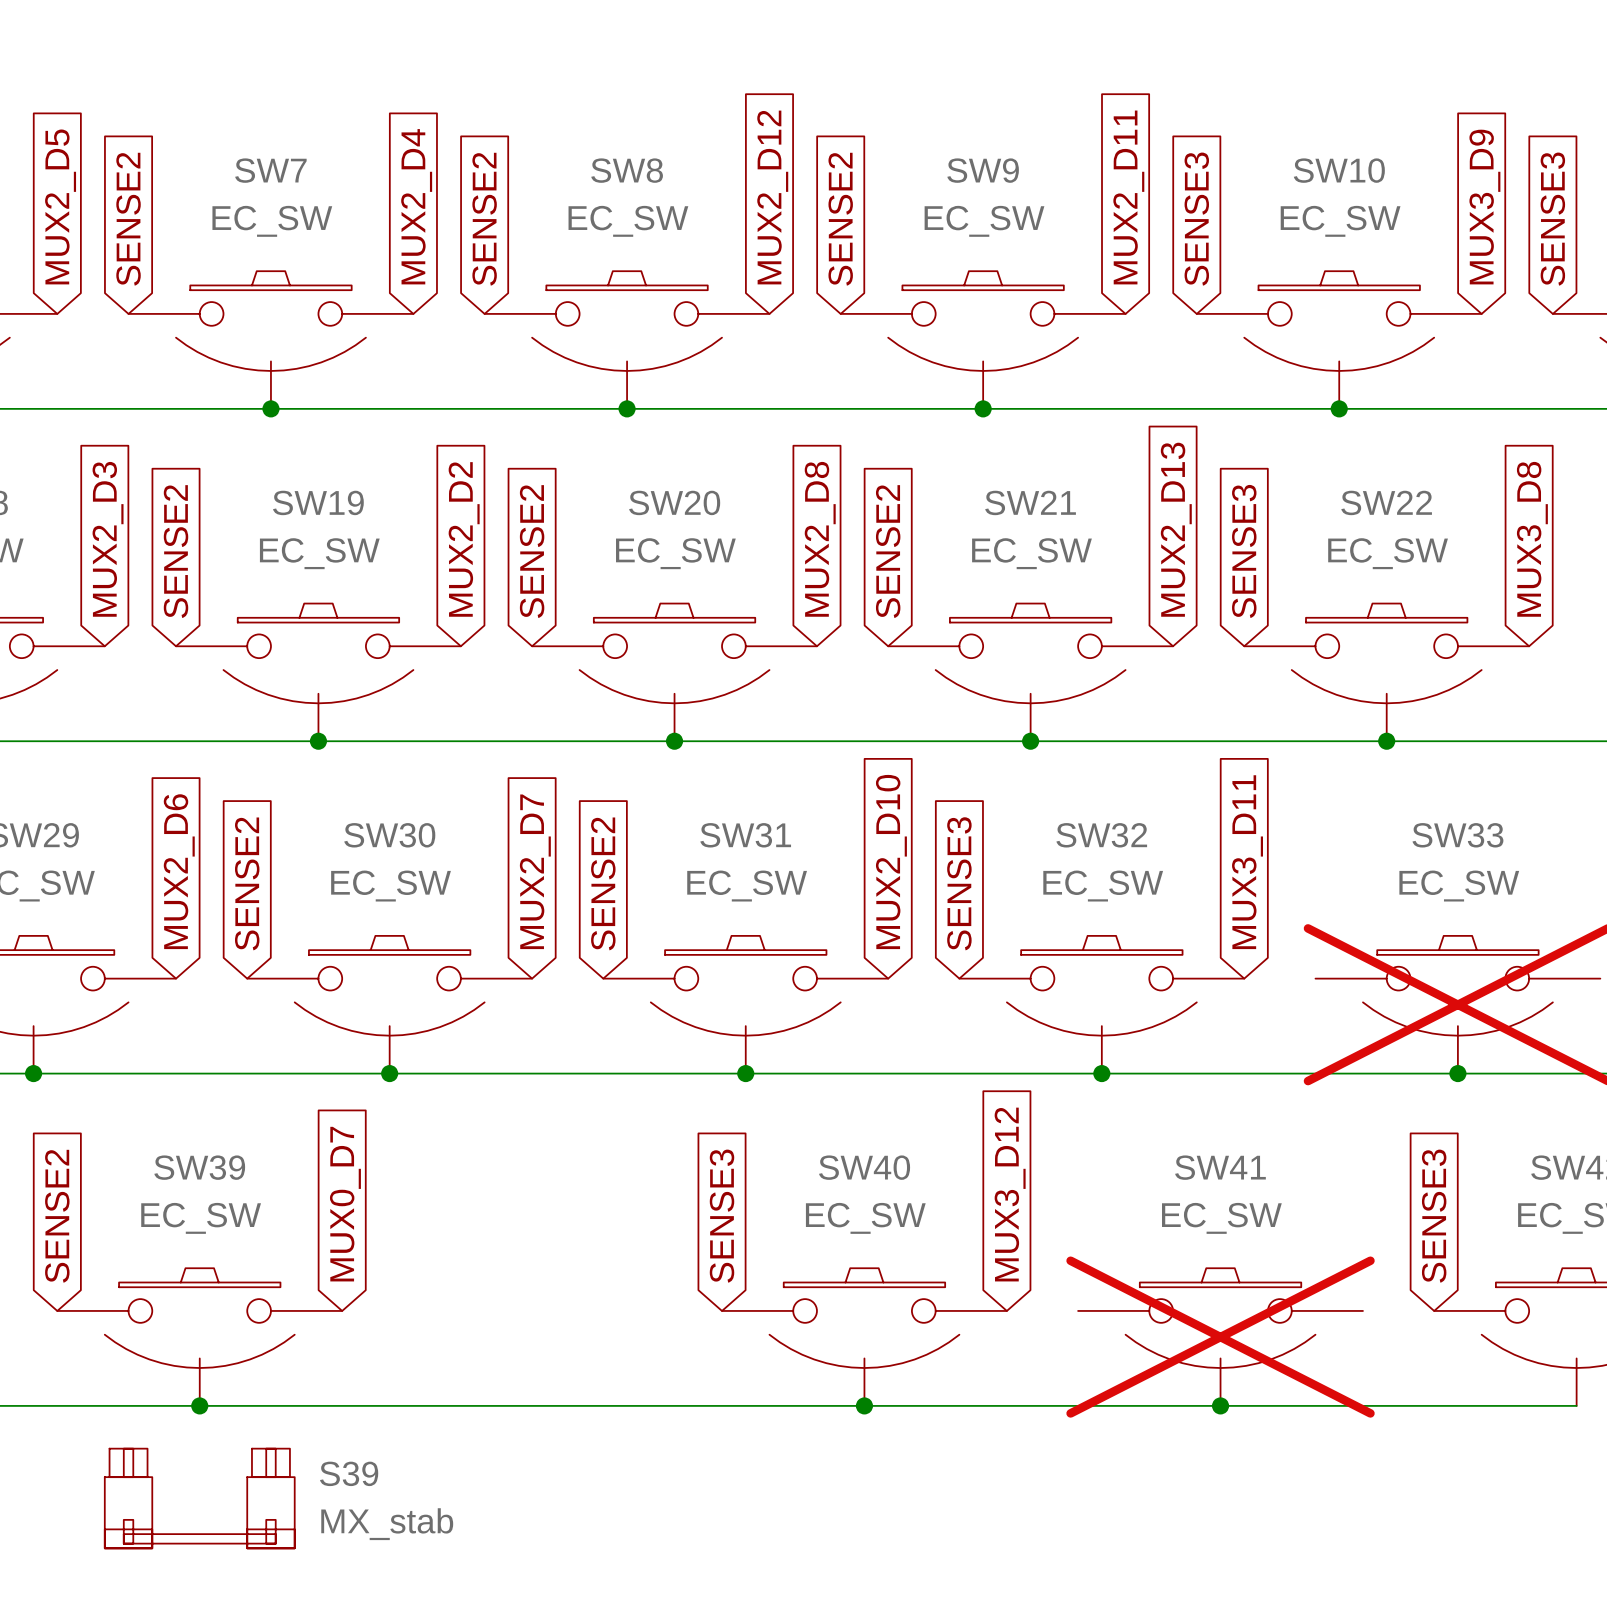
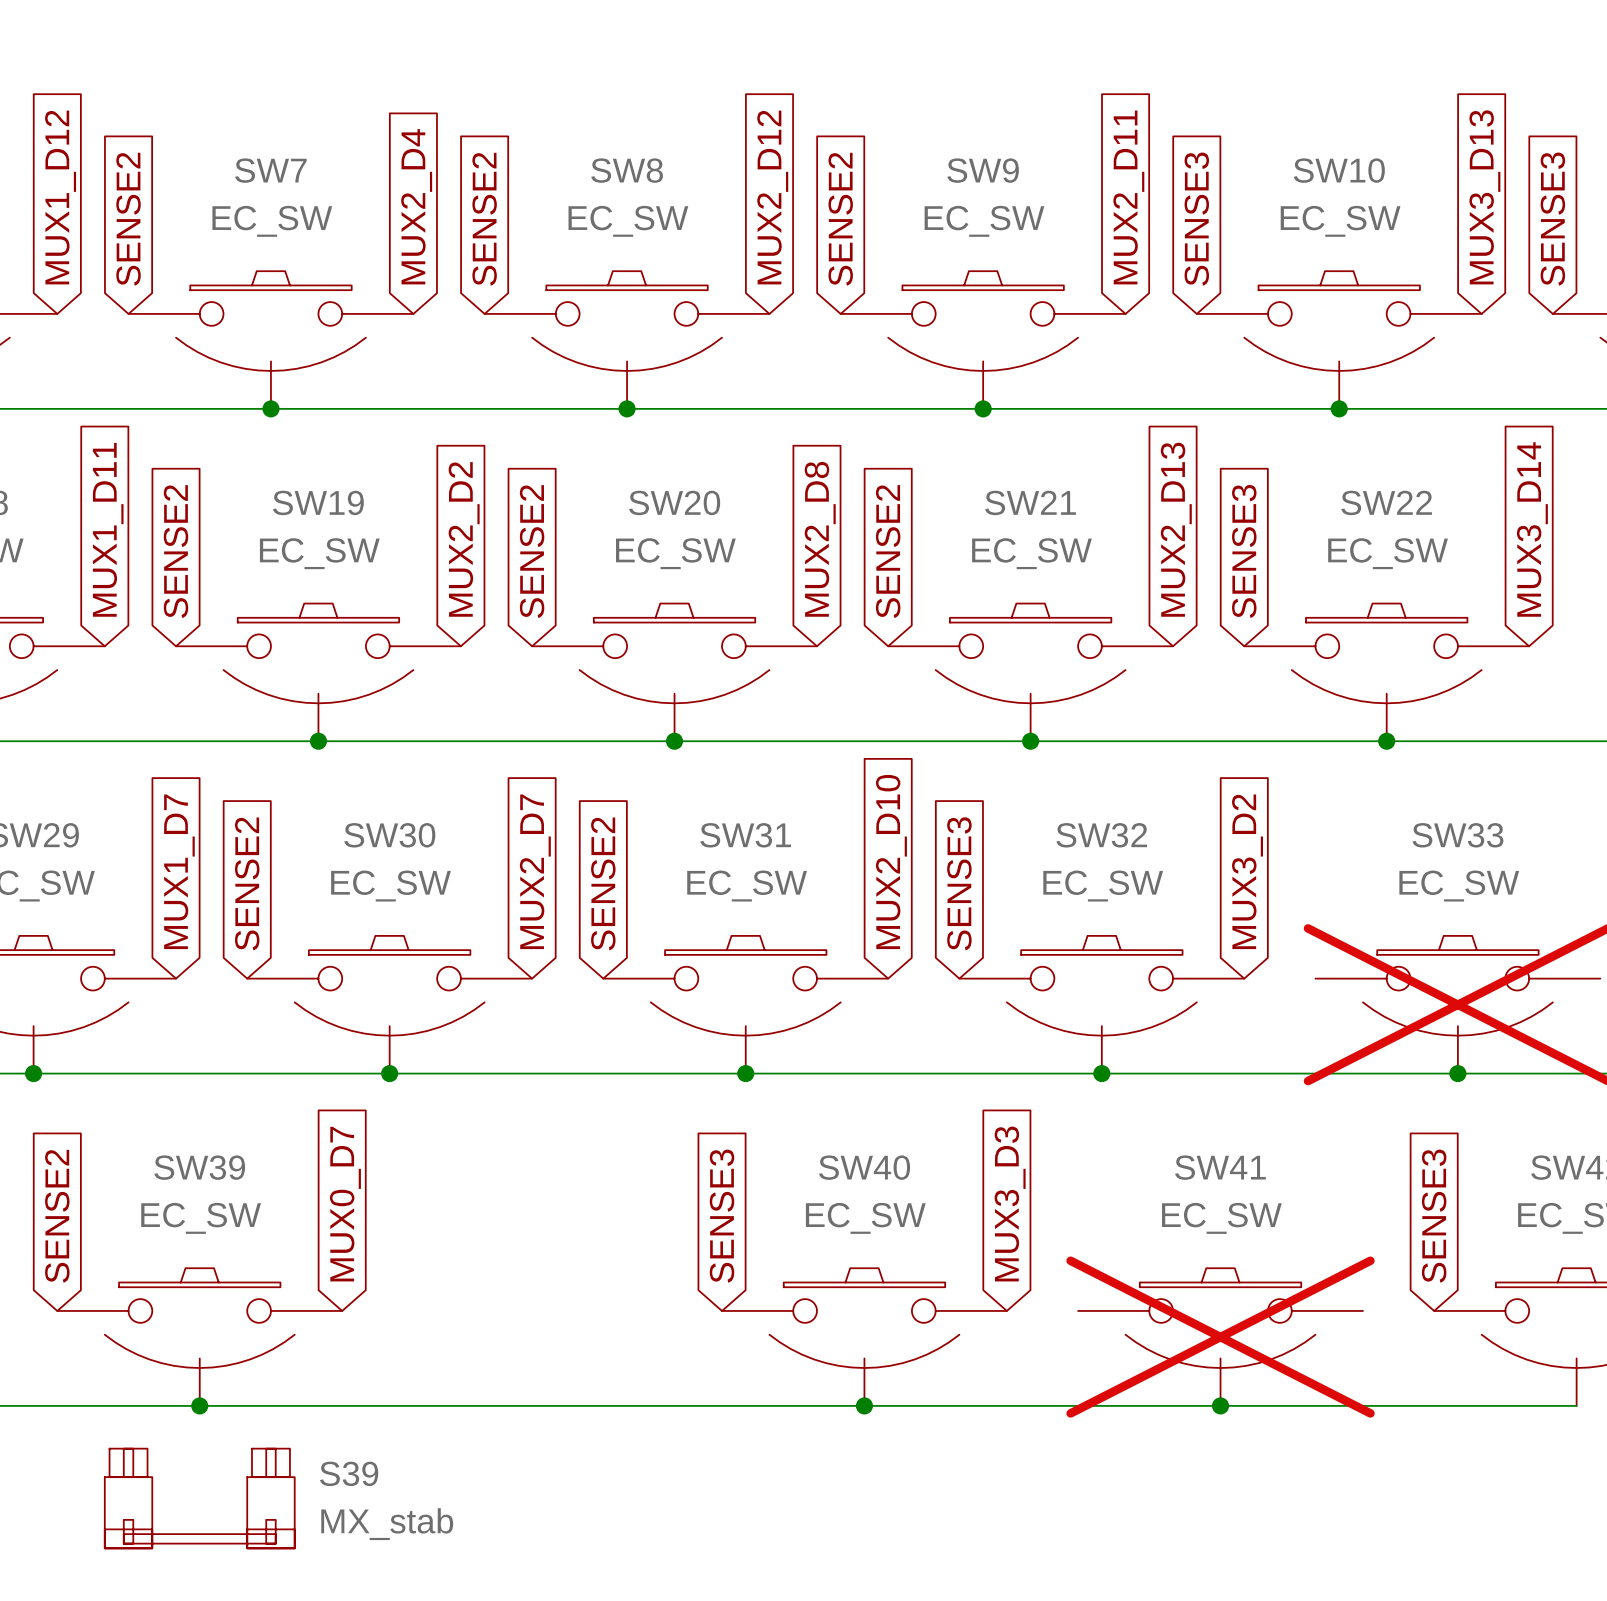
global label: MUX2_D5 (60, 206) -> MUX1_D12 (60, 197)
global label: MUX3_D9 (1484, 207) -> MUX3_D13 (1484, 197)
global label: MUX2_D3 (108, 539) -> MUX1_D11 (108, 529)
global label: MUX3_D8 (1532, 539) -> MUX3_D14 (1532, 529)
global label: MUX3_D11 (1247, 862) -> MUX3_D2 (1247, 871)
global label: MUX2_D6 (179, 871) -> MUX1_D7 (179, 871)
global label: MUX3_D12 (1010, 1194) -> MUX3_D3 (1010, 1204)

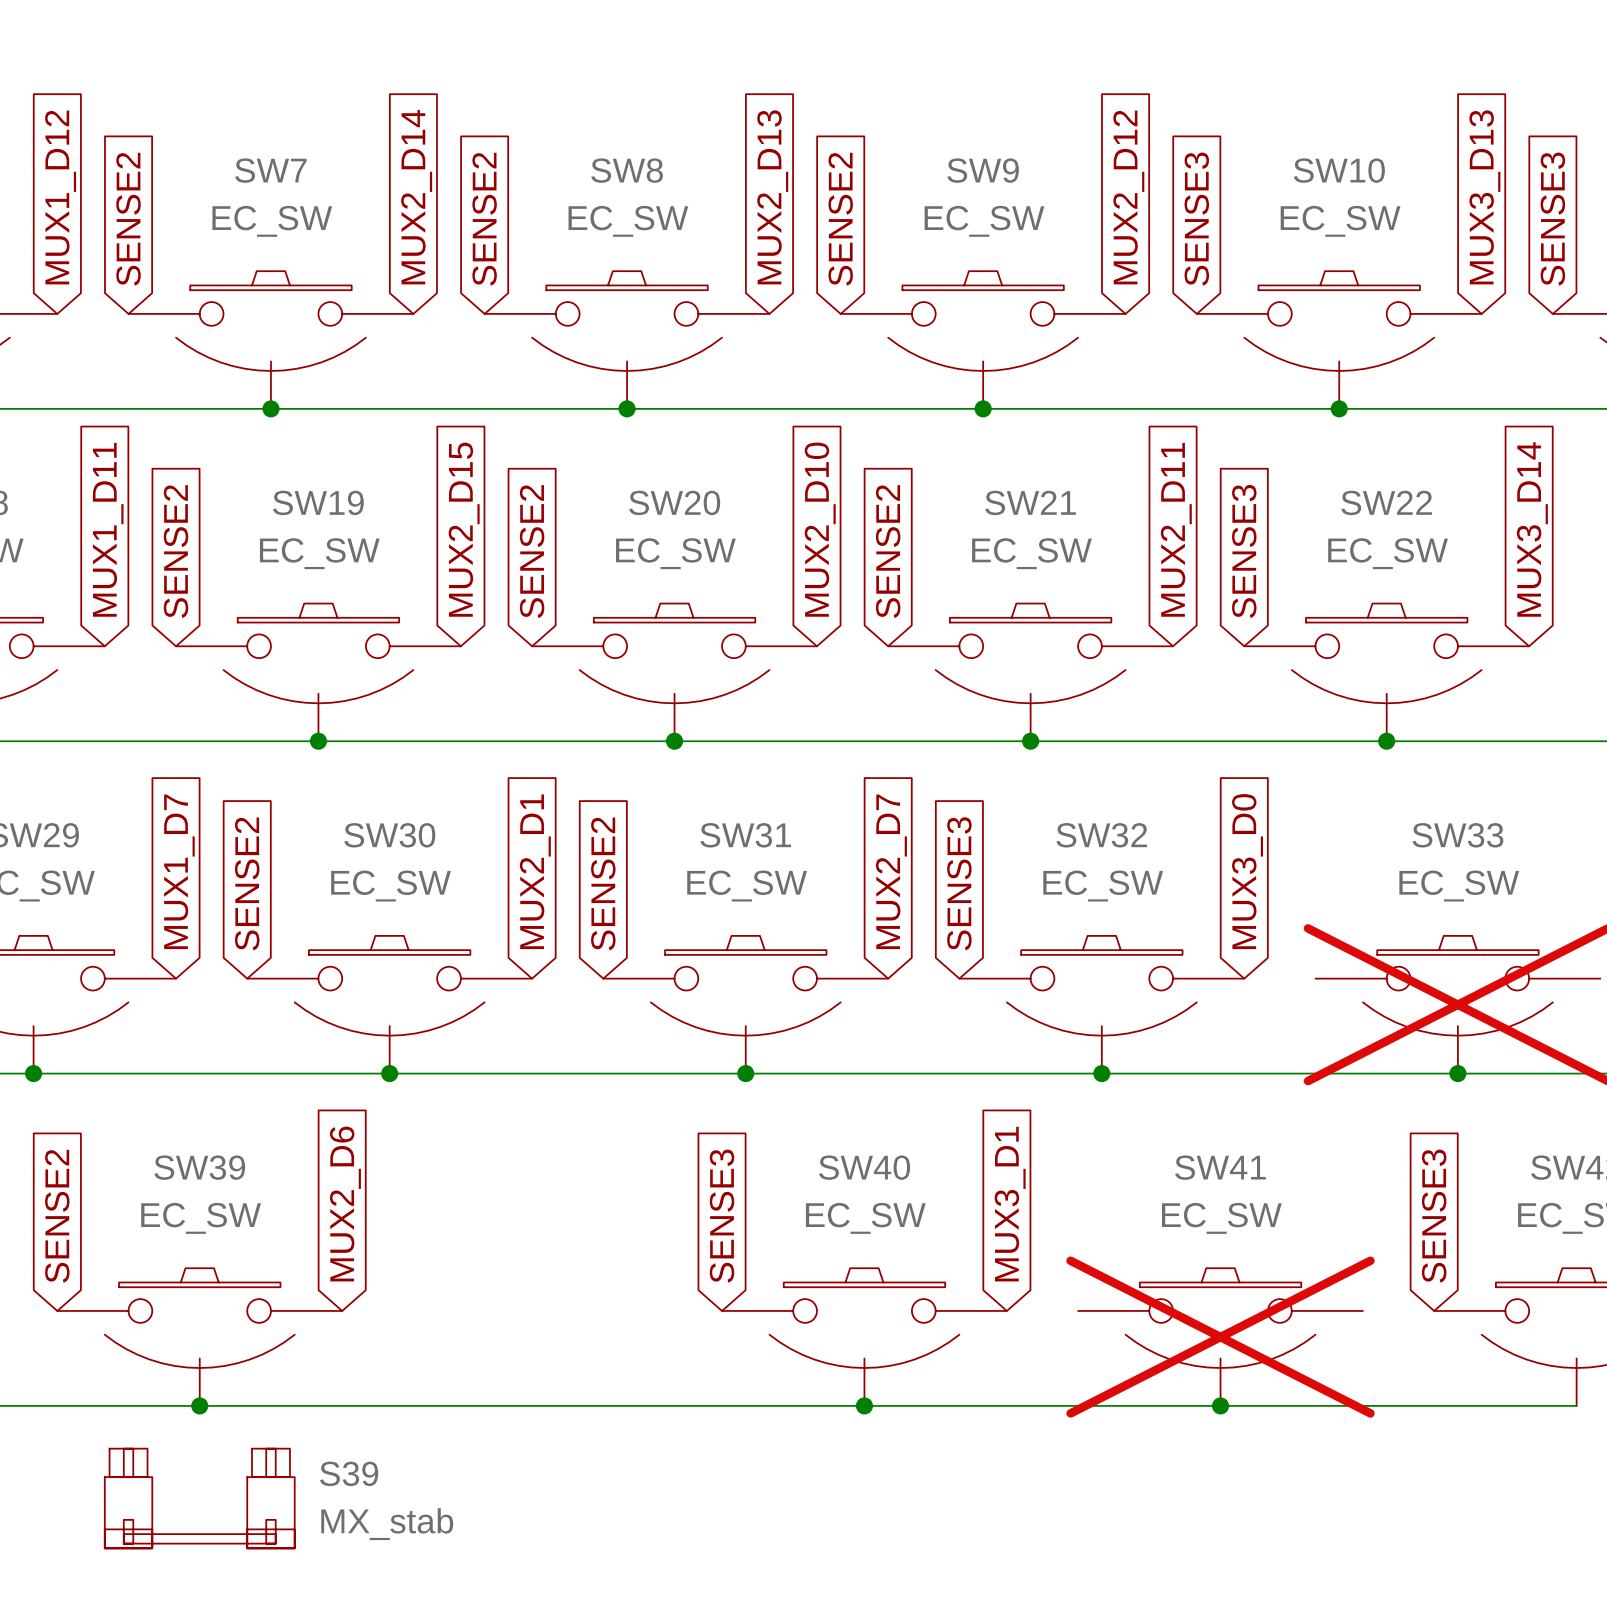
global label: MUX2_D12 (772, 197) -> MUX2_D13 (772, 197)
global label: MUX2_D11 (1128, 197) -> MUX2_D12 (1128, 197)
global label: MUX2_D4 (416, 206) -> MUX2_D14 (416, 197)
global label: MUX2_D13 (1176, 529) -> MUX2_D11 (1176, 529)
global label: MUX2_D2 (464, 539) -> MUX2_D15 (464, 529)
global label: MUX2_D8 (820, 539) -> MUX2_D10 (820, 529)
global label: MUX2_D10 (891, 862) -> MUX2_D7 (891, 871)
global label: MUX2_D7 (535, 871) -> MUX2_D1 (535, 871)
global label: MUX3_D2 (1247, 871) -> MUX3_D0 (1247, 871)
global label: MUX0_D7 (345, 1204) -> MUX2_D6 (345, 1204)
global label: MUX3_D3 (1010, 1204) -> MUX3_D1 (1010, 1204)

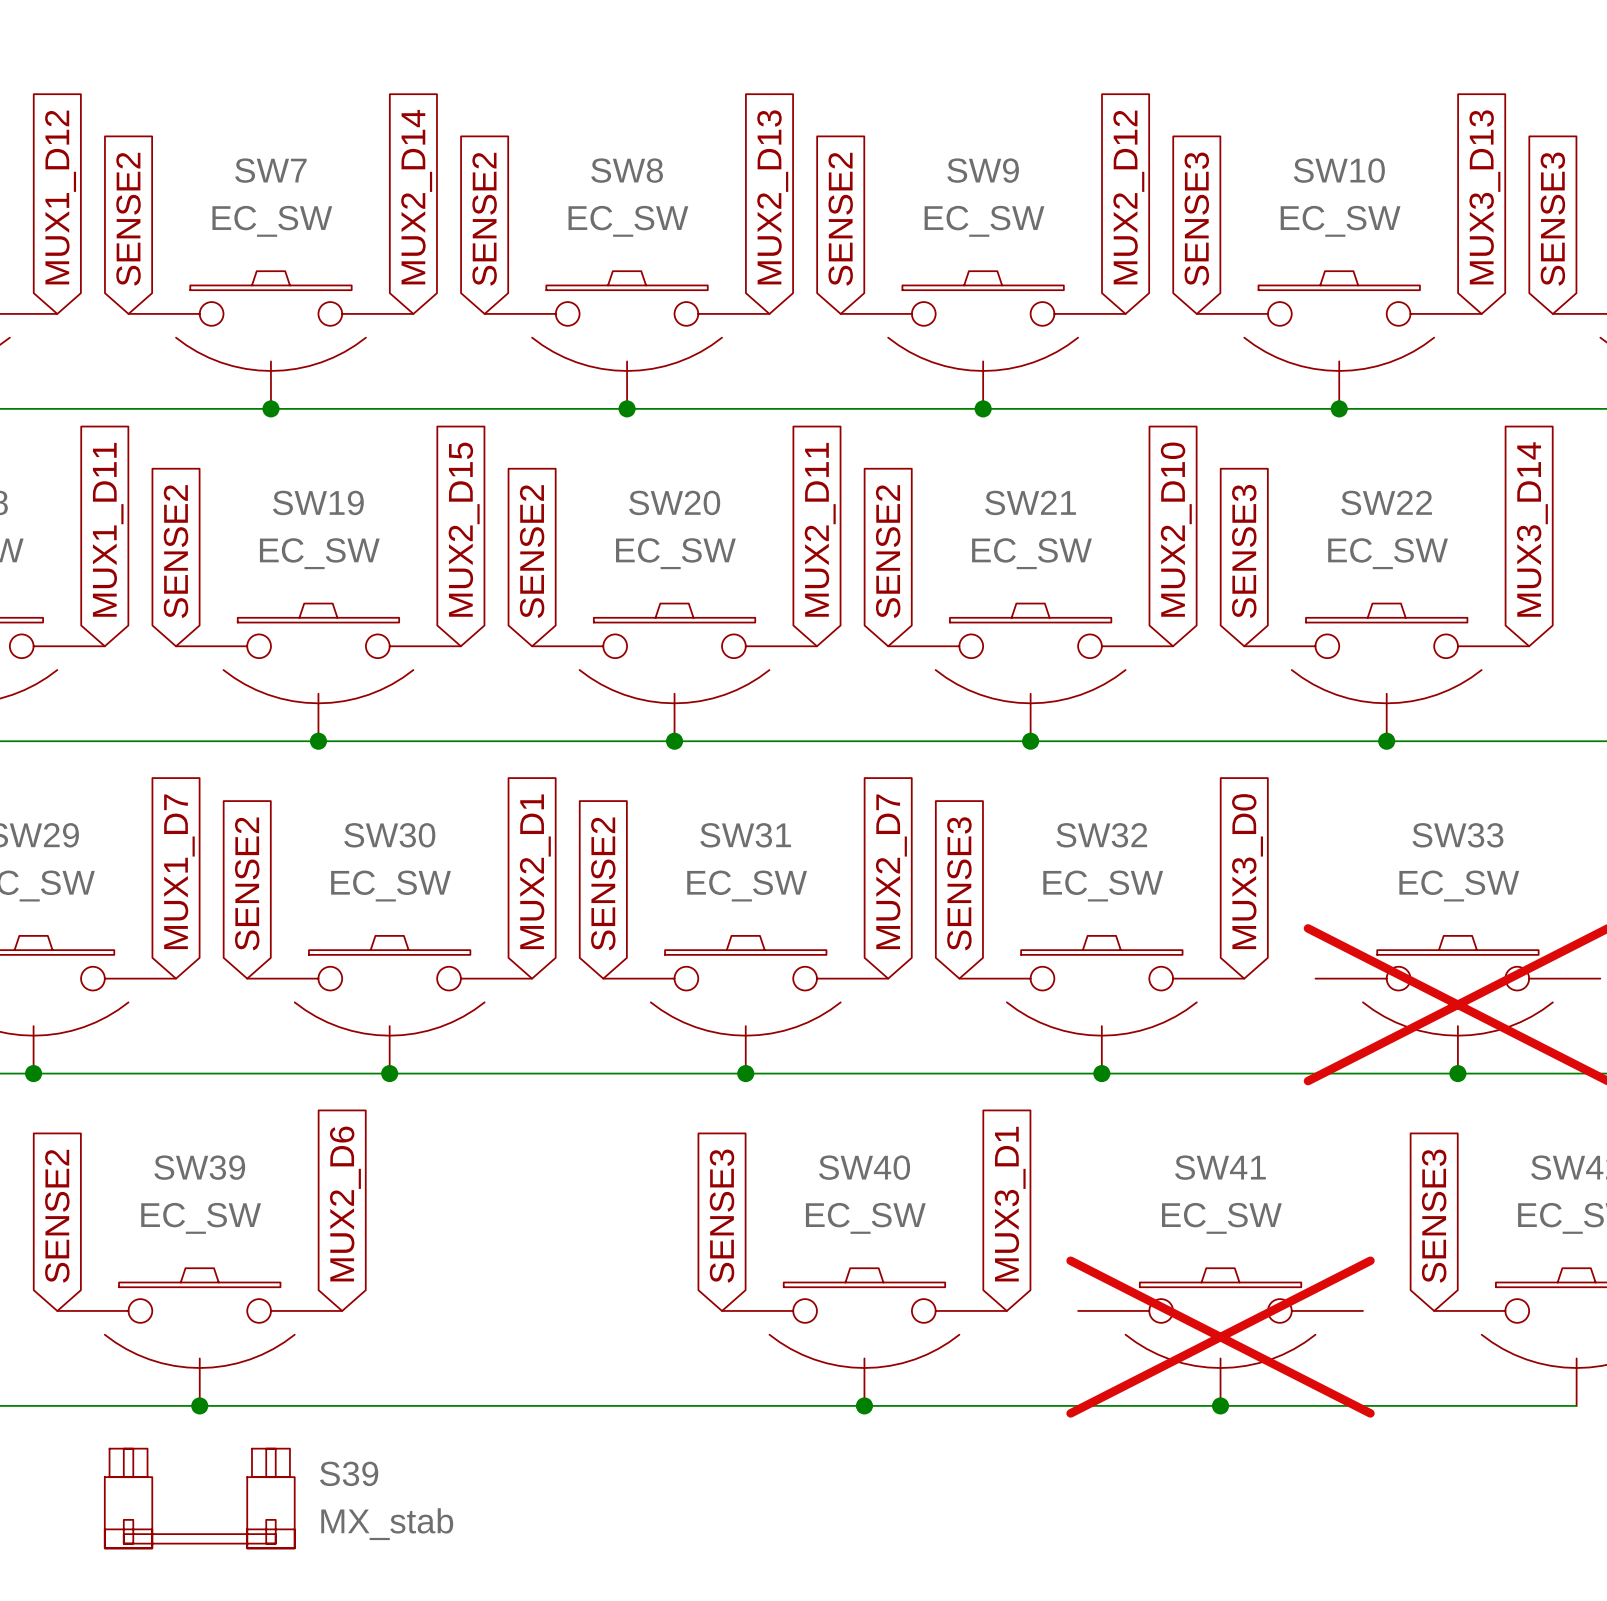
global label: MUX2_D10 (820, 529) -> MUX2_D11 (820, 529)
global label: MUX2_D11 (1176, 529) -> MUX2_D10 (1176, 529)

